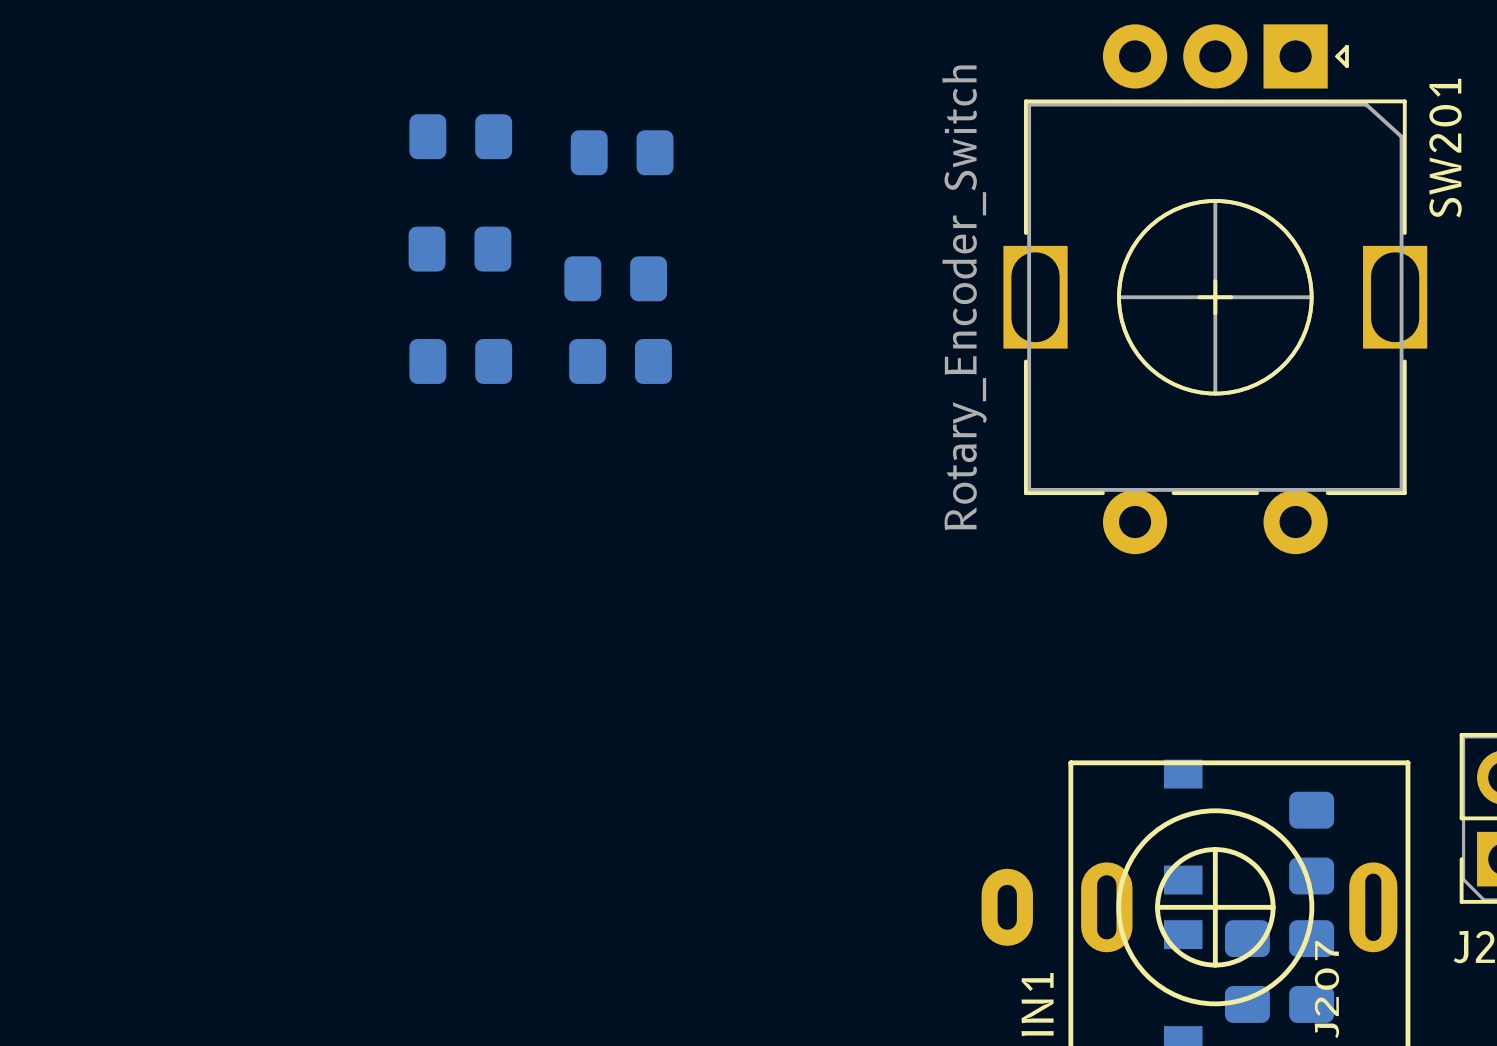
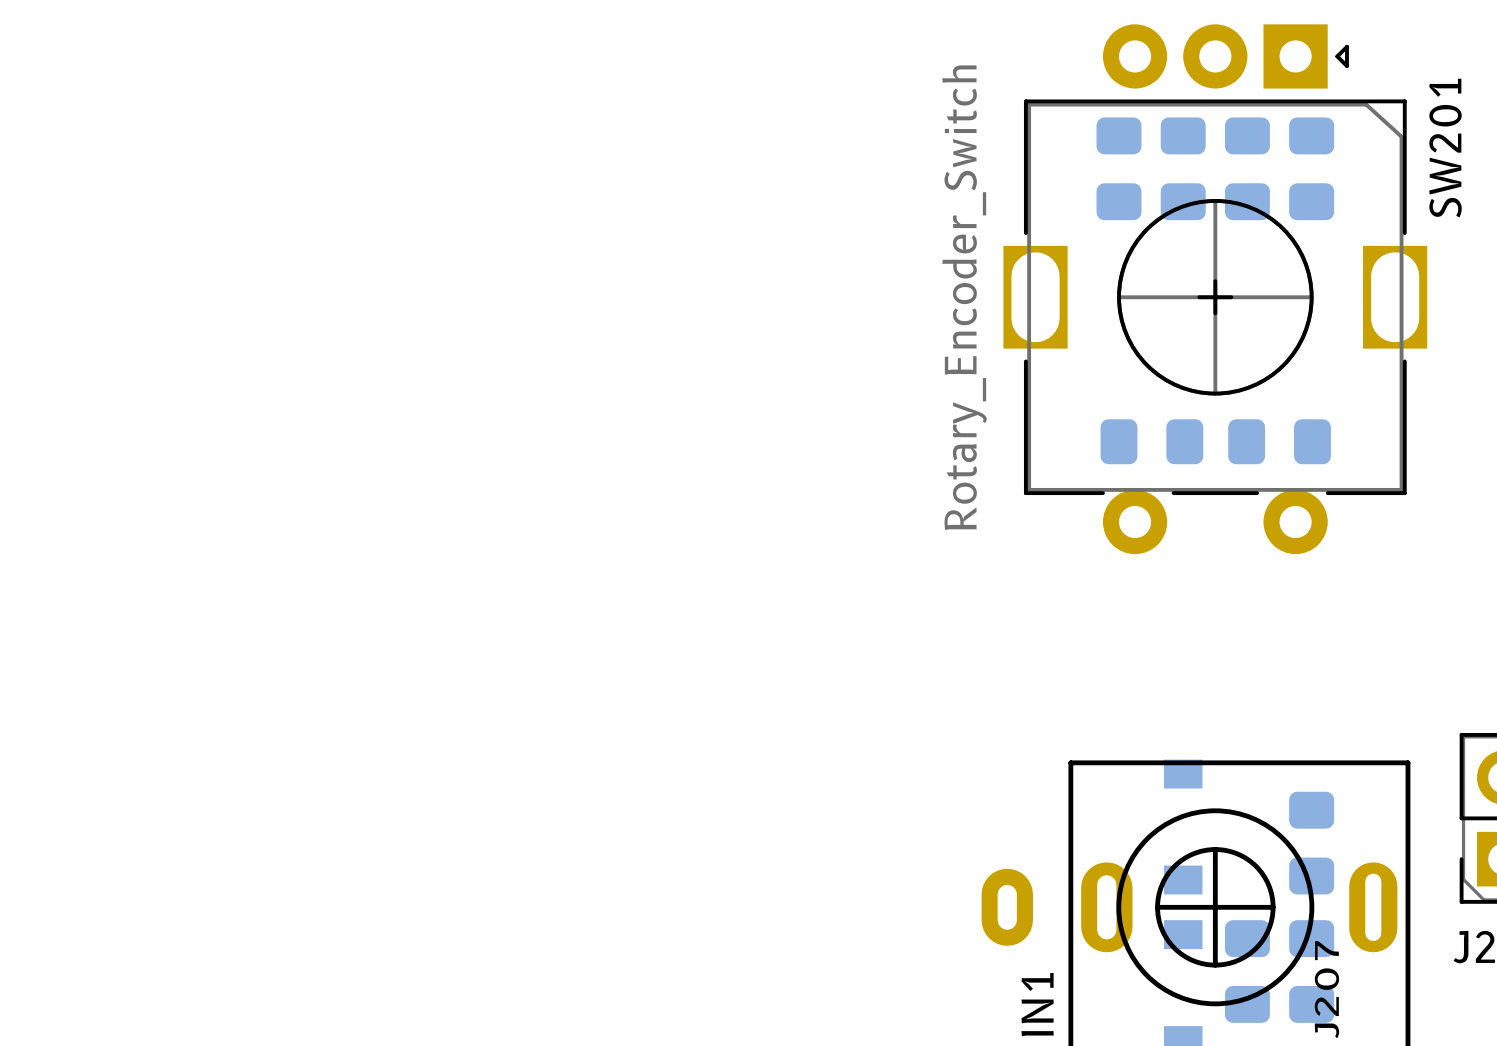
part: (460, 136) -> none
part: (622, 152) -> none
part: none -> (1119, 168)
part: none -> (1183, 168)
part: none -> (1247, 168)
part: none -> (1311, 168)
part: (459, 249) -> none
part: (615, 278) -> none
part: (460, 361) -> none
part: (620, 361) -> none
part: none -> (1151, 441)
part: none -> (1279, 441)

